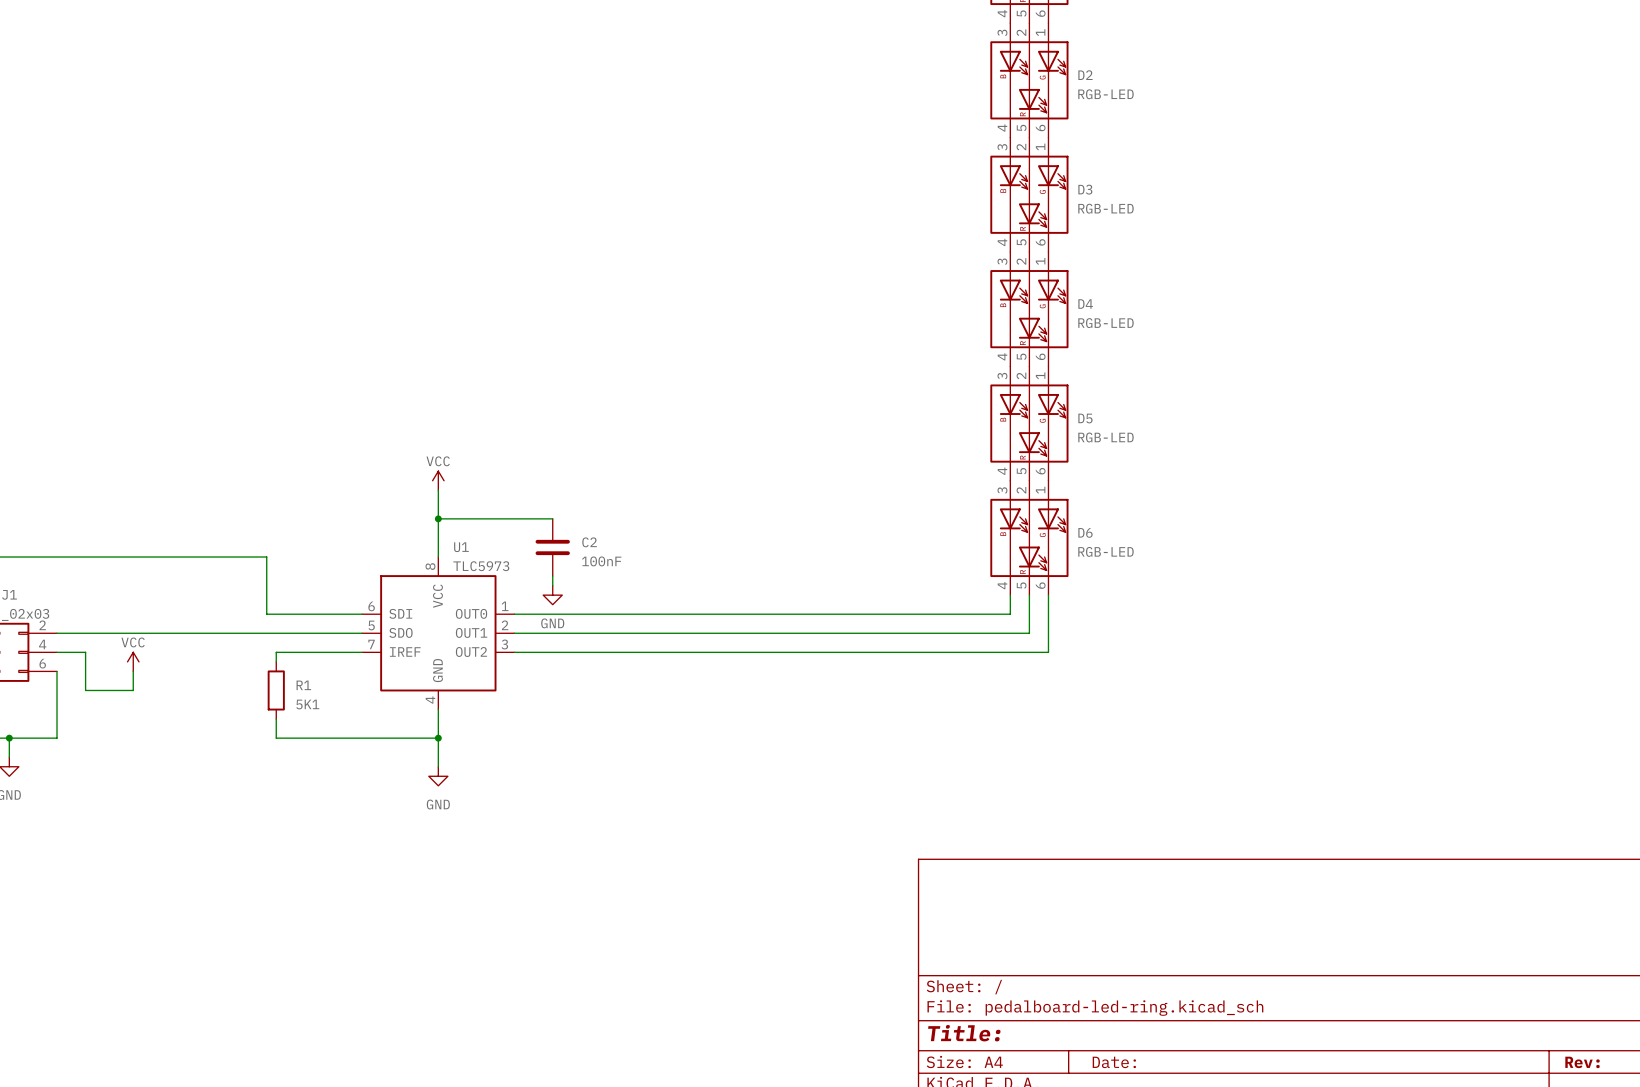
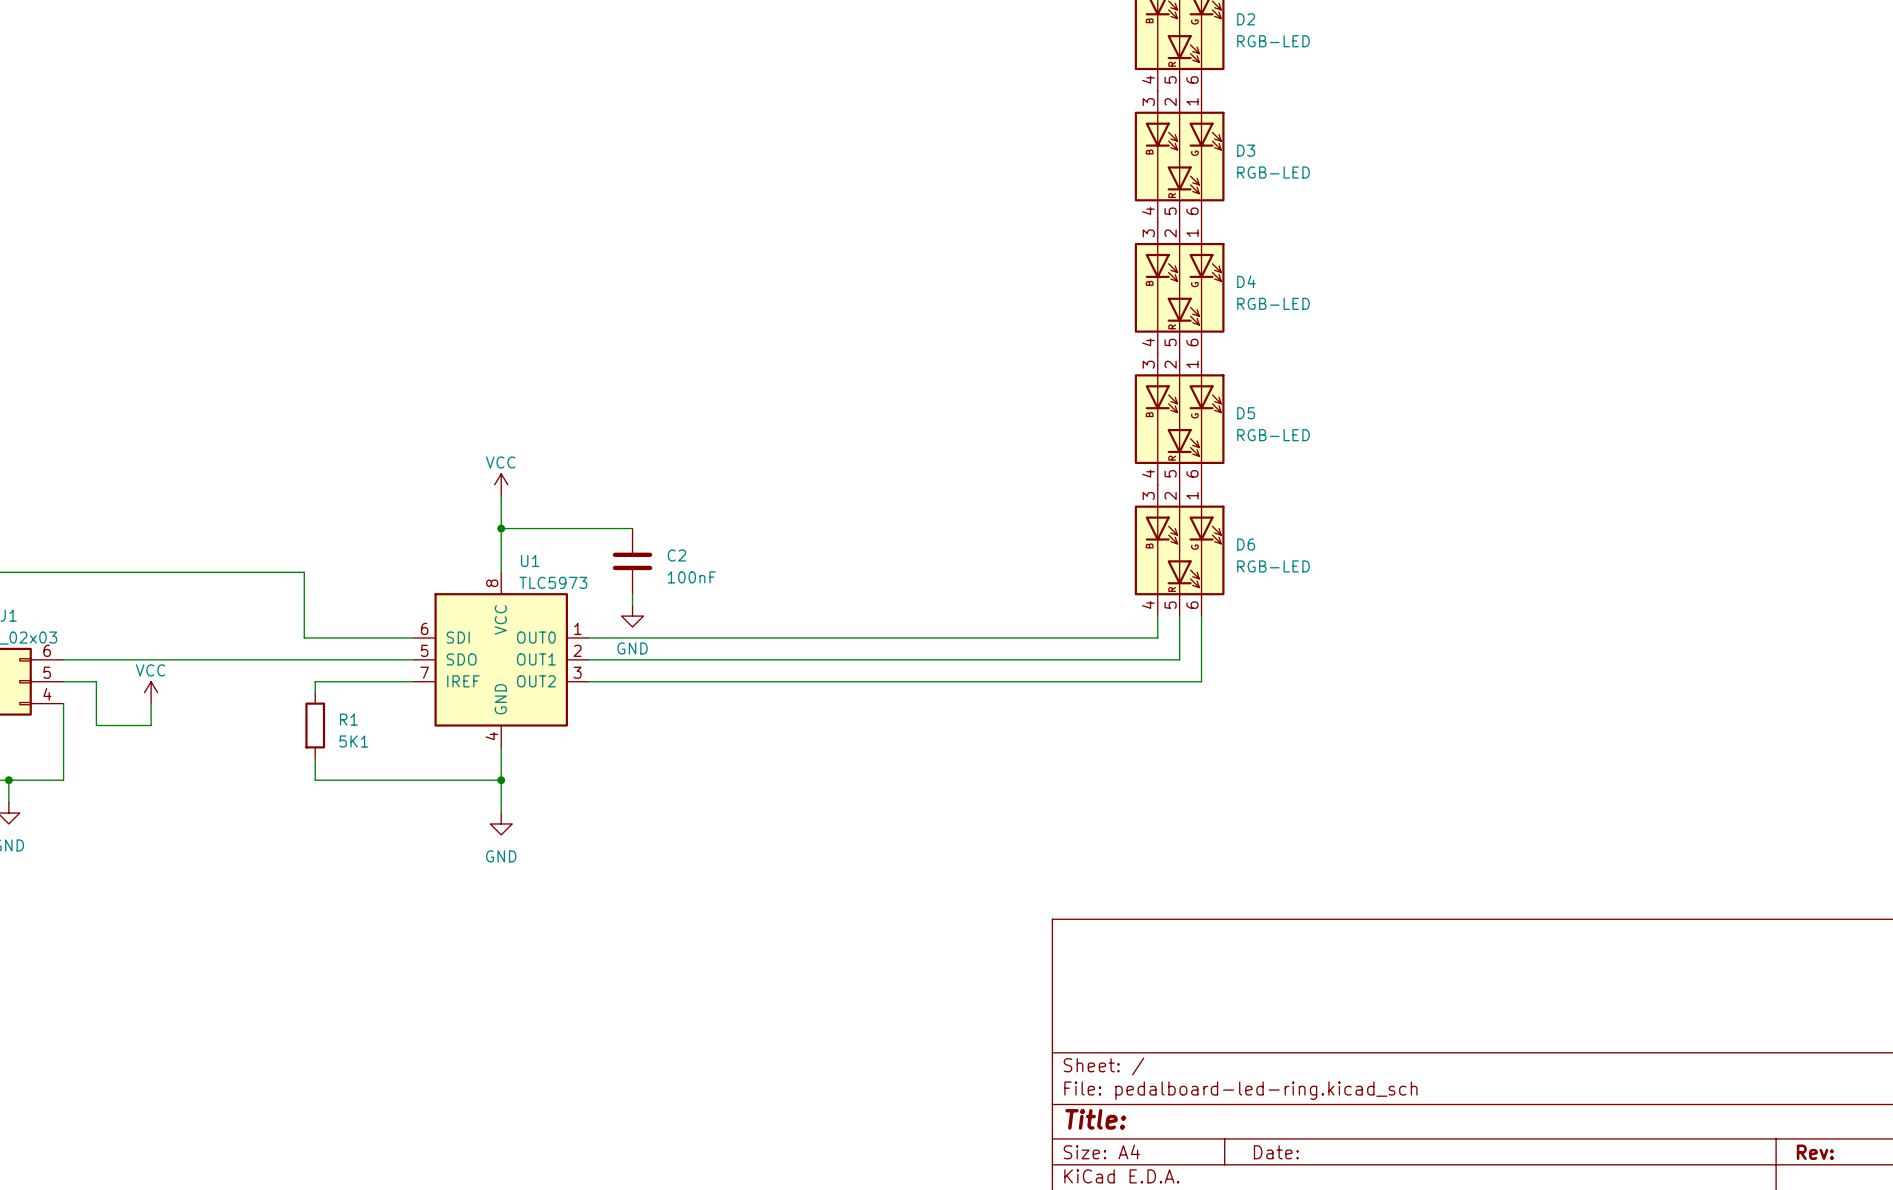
J1 pin number: 2 (42, 625) -> 6 (47, 650)
J1 pin number: 4 (42, 644) -> 5 (47, 672)
J1 pin number: 6 (42, 663) -> 4 (47, 694)

